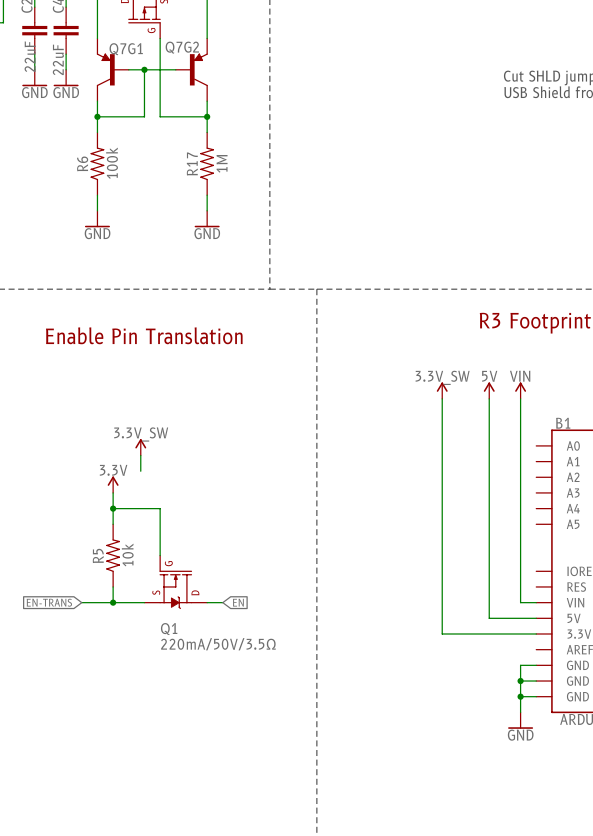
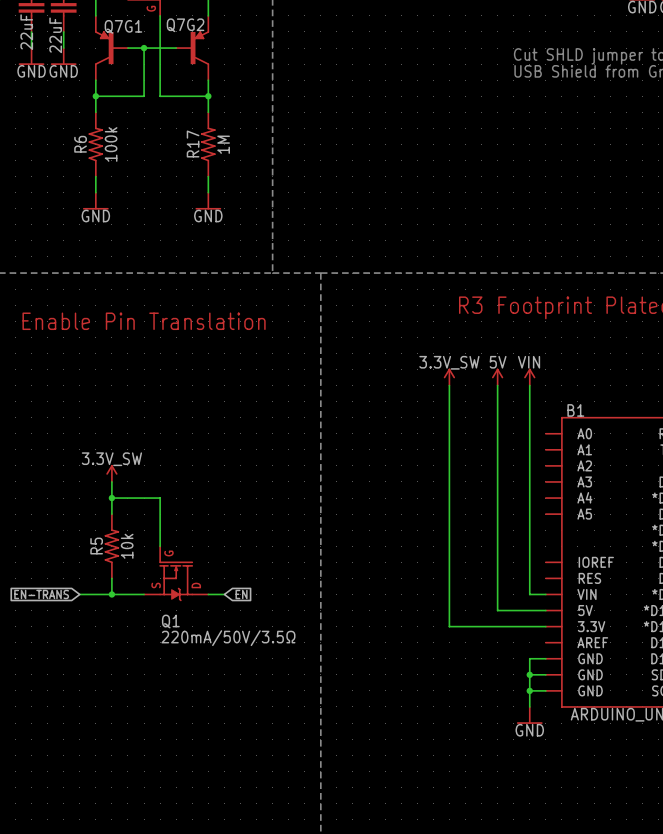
power symbol: 3.3V_SW (140, 447) -> none
wire: (140, 455) (140, 471) -> none
power symbol: 3.3V (113, 484) -> 3.3V_SW (111, 473)

